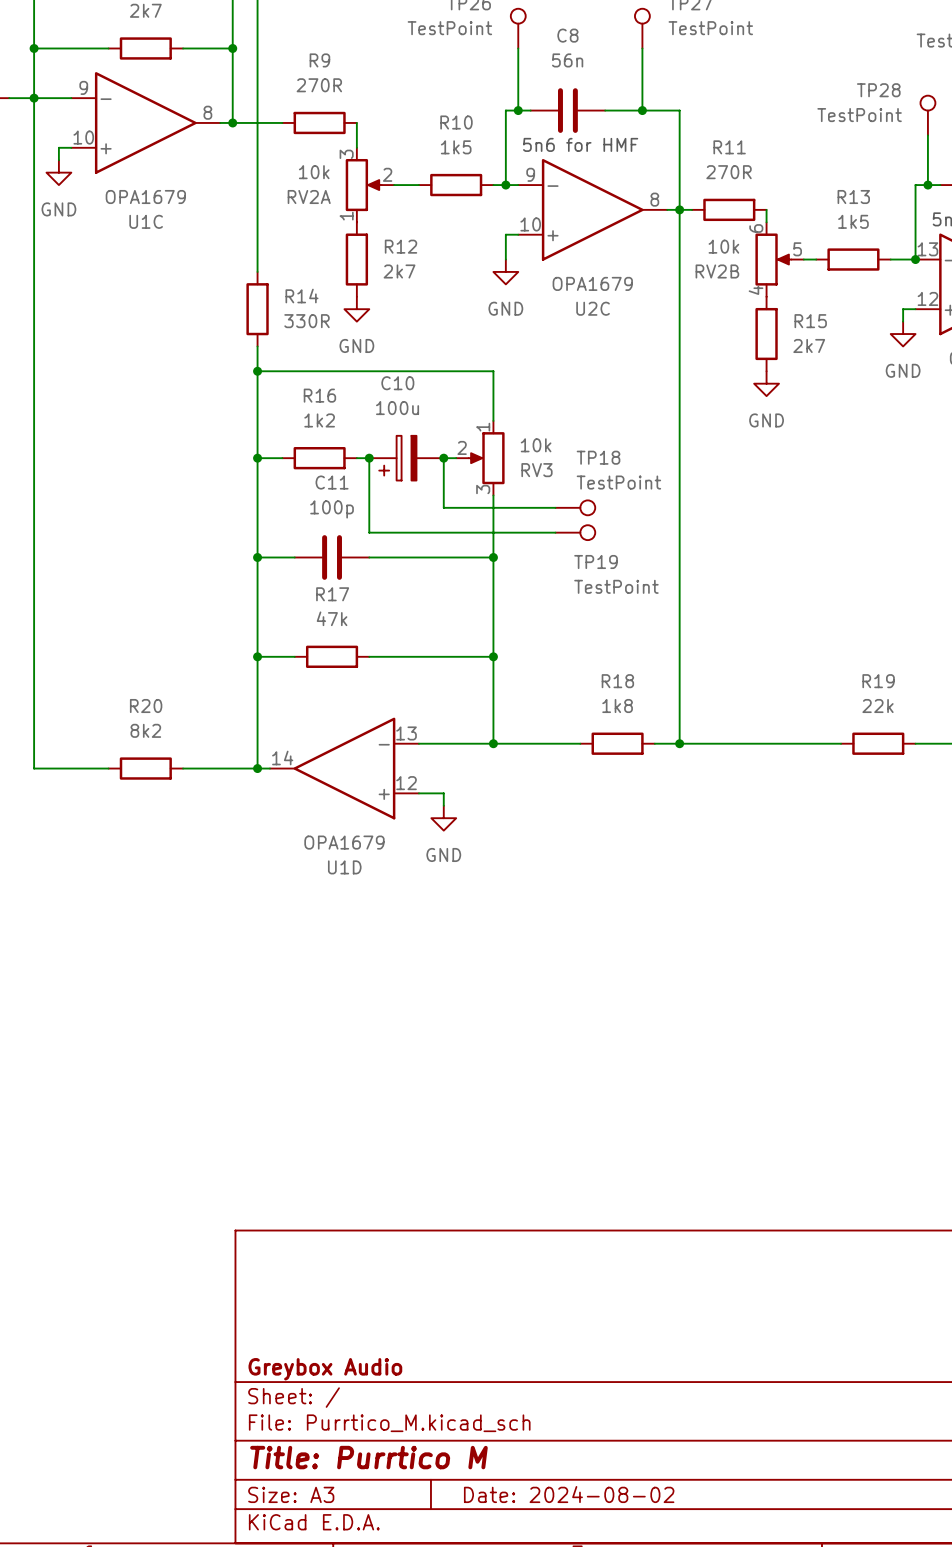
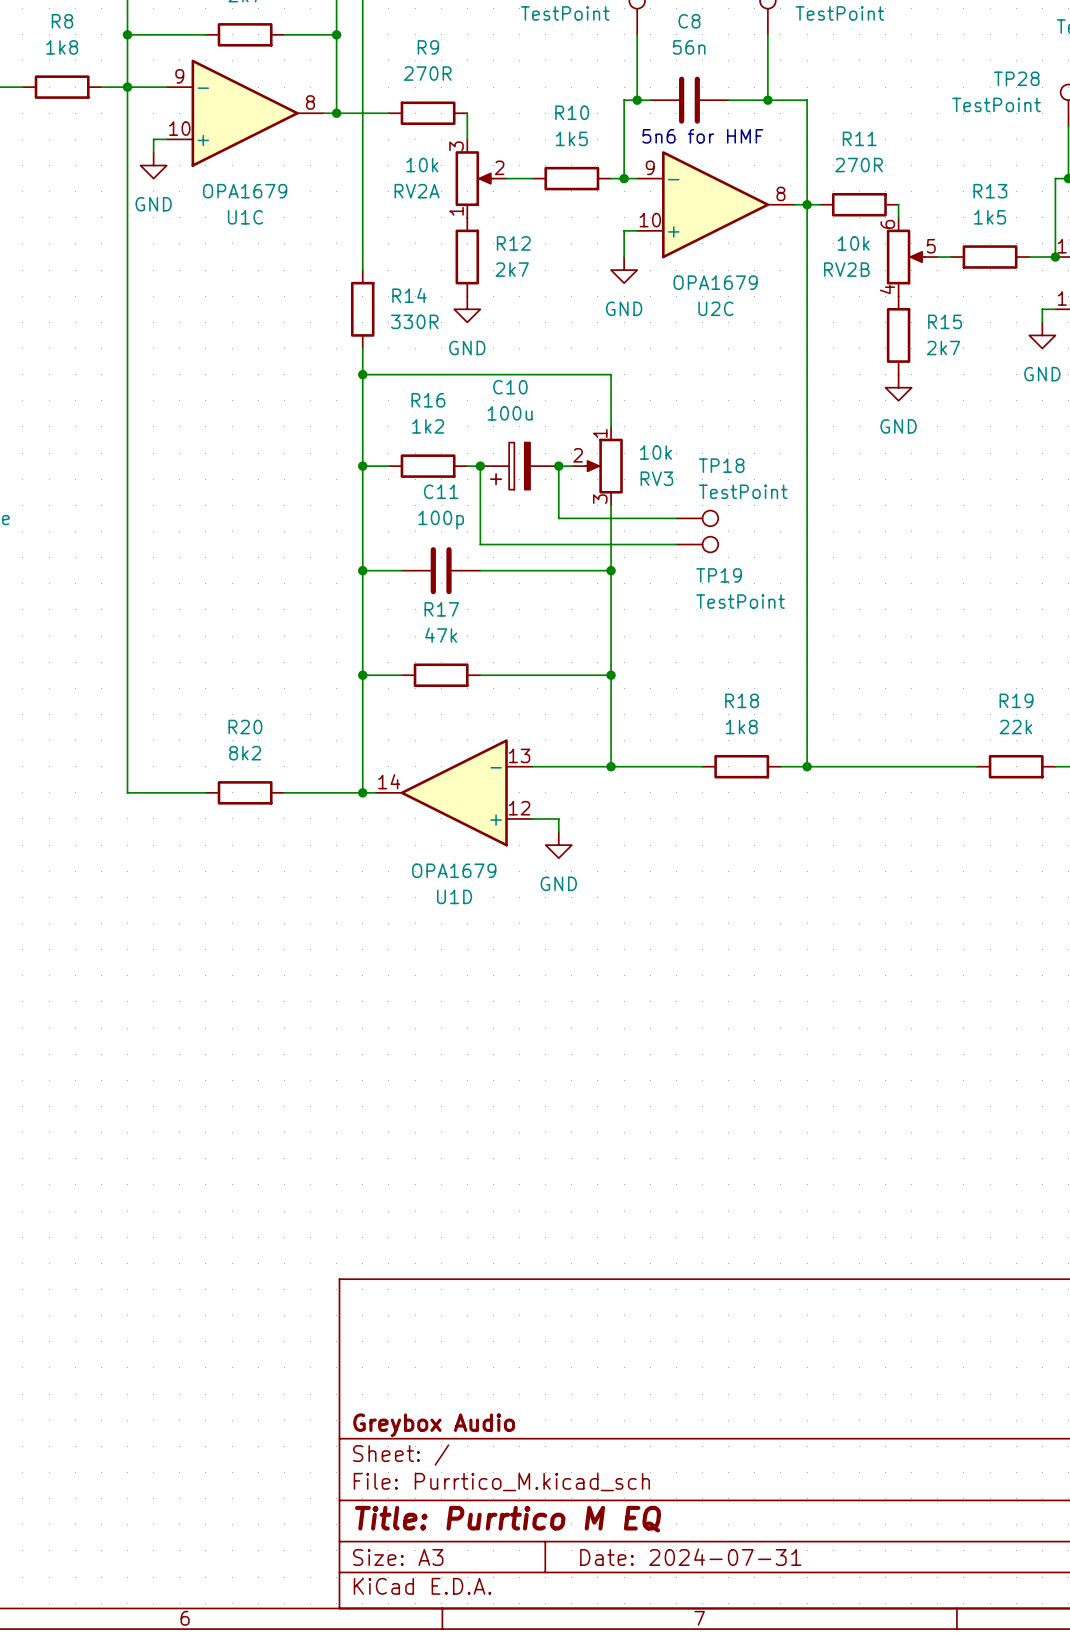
title block: Title: Purrtico M (368, 1457) -> Title: Purrtico M EQ (508, 1519)
title block: Date: 2024-08-02 (569, 1494) -> Date: 2024-07-31 (690, 1557)

